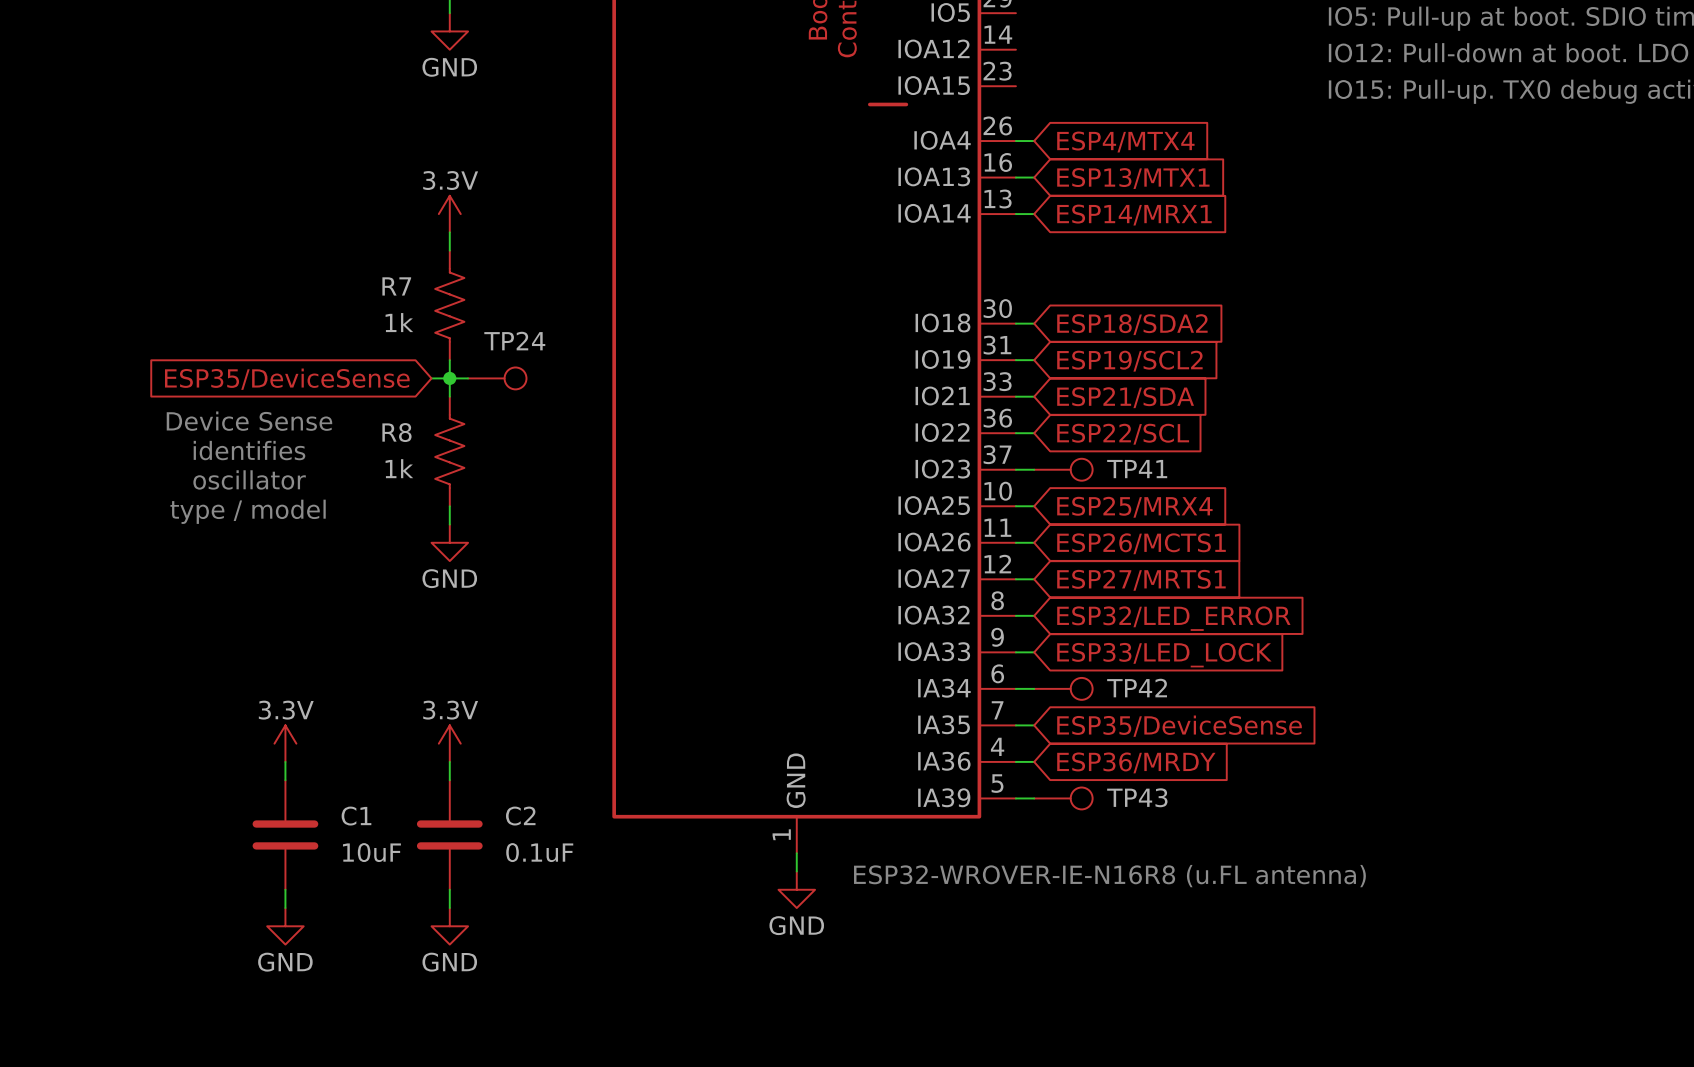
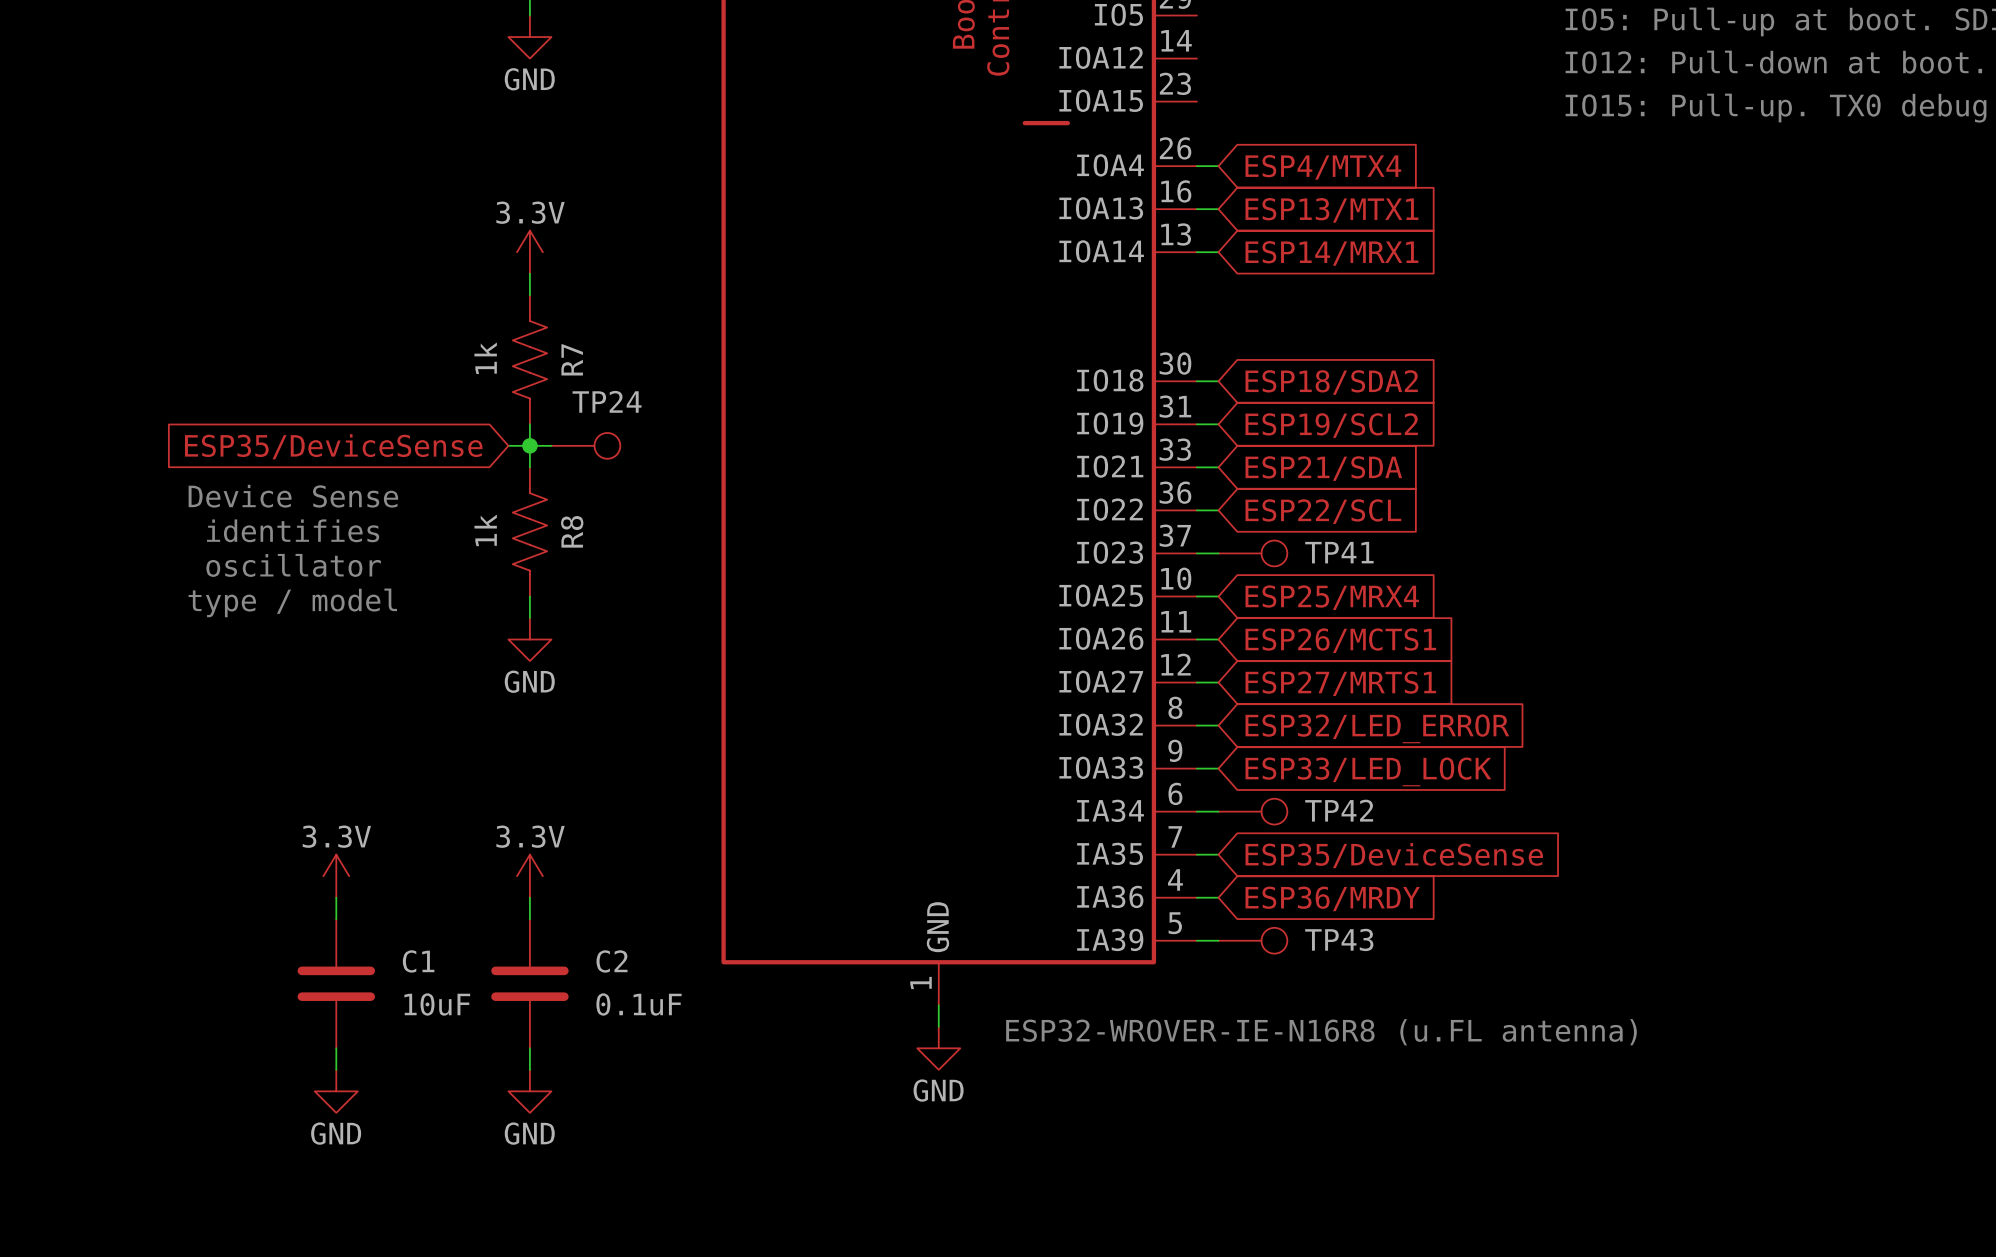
R7 name rotation: 0° (396, 286) -> 90° counterclockwise (572, 359)
R7 name position: R7 (396, 286) -> R7 (572, 359)
R7 value rotation: 0° (399, 322) -> 90° counterclockwise (485, 358)
R8 name rotation: 0° (396, 432) -> 90° counterclockwise (572, 531)
R8 name position: R8 (396, 432) -> R8 (572, 531)
R8 value rotation: 0° (399, 468) -> 90° counterclockwise (485, 530)

